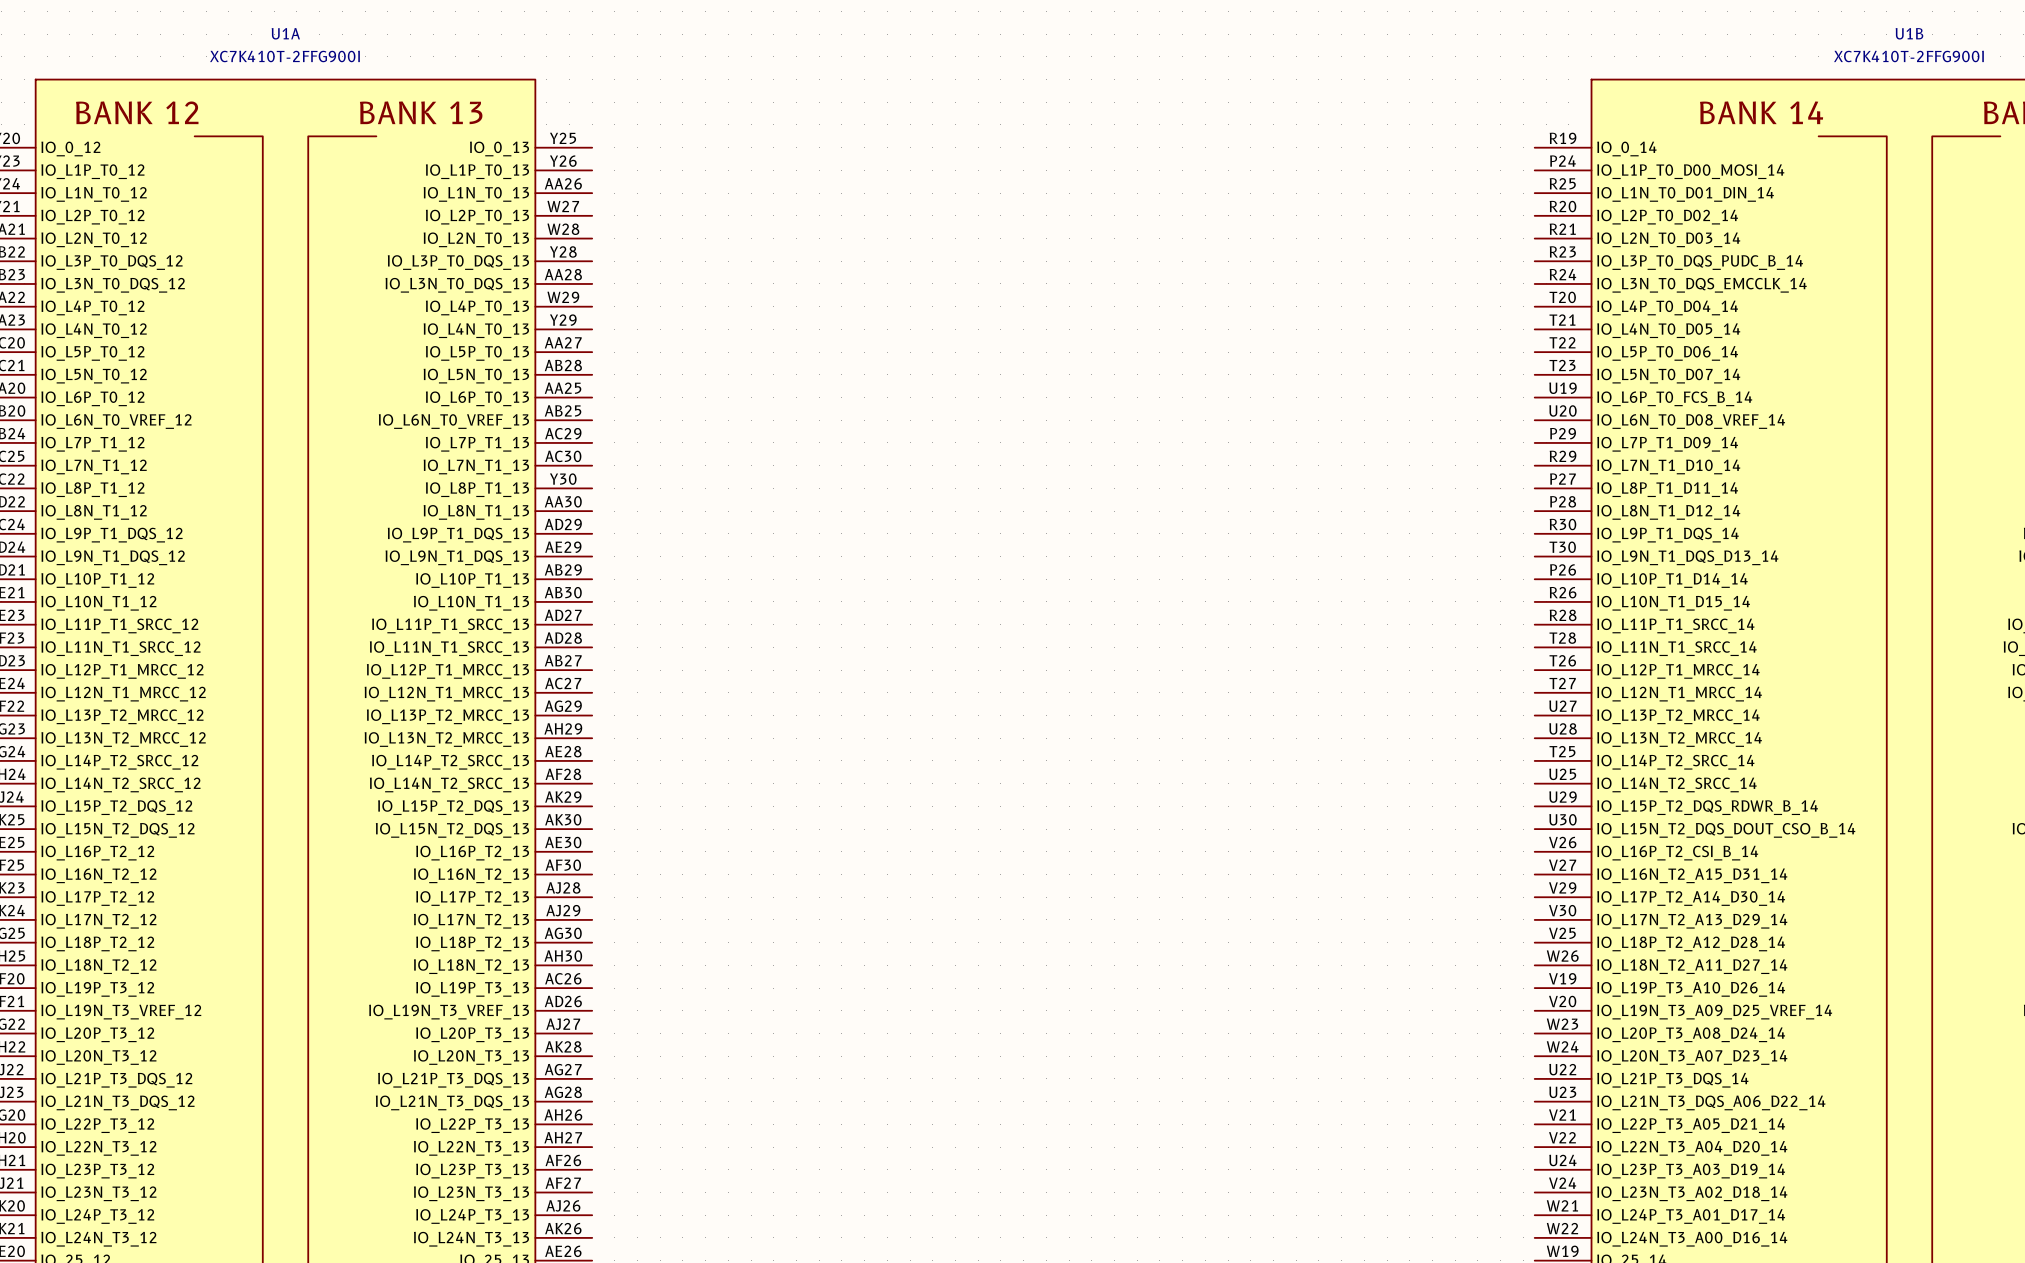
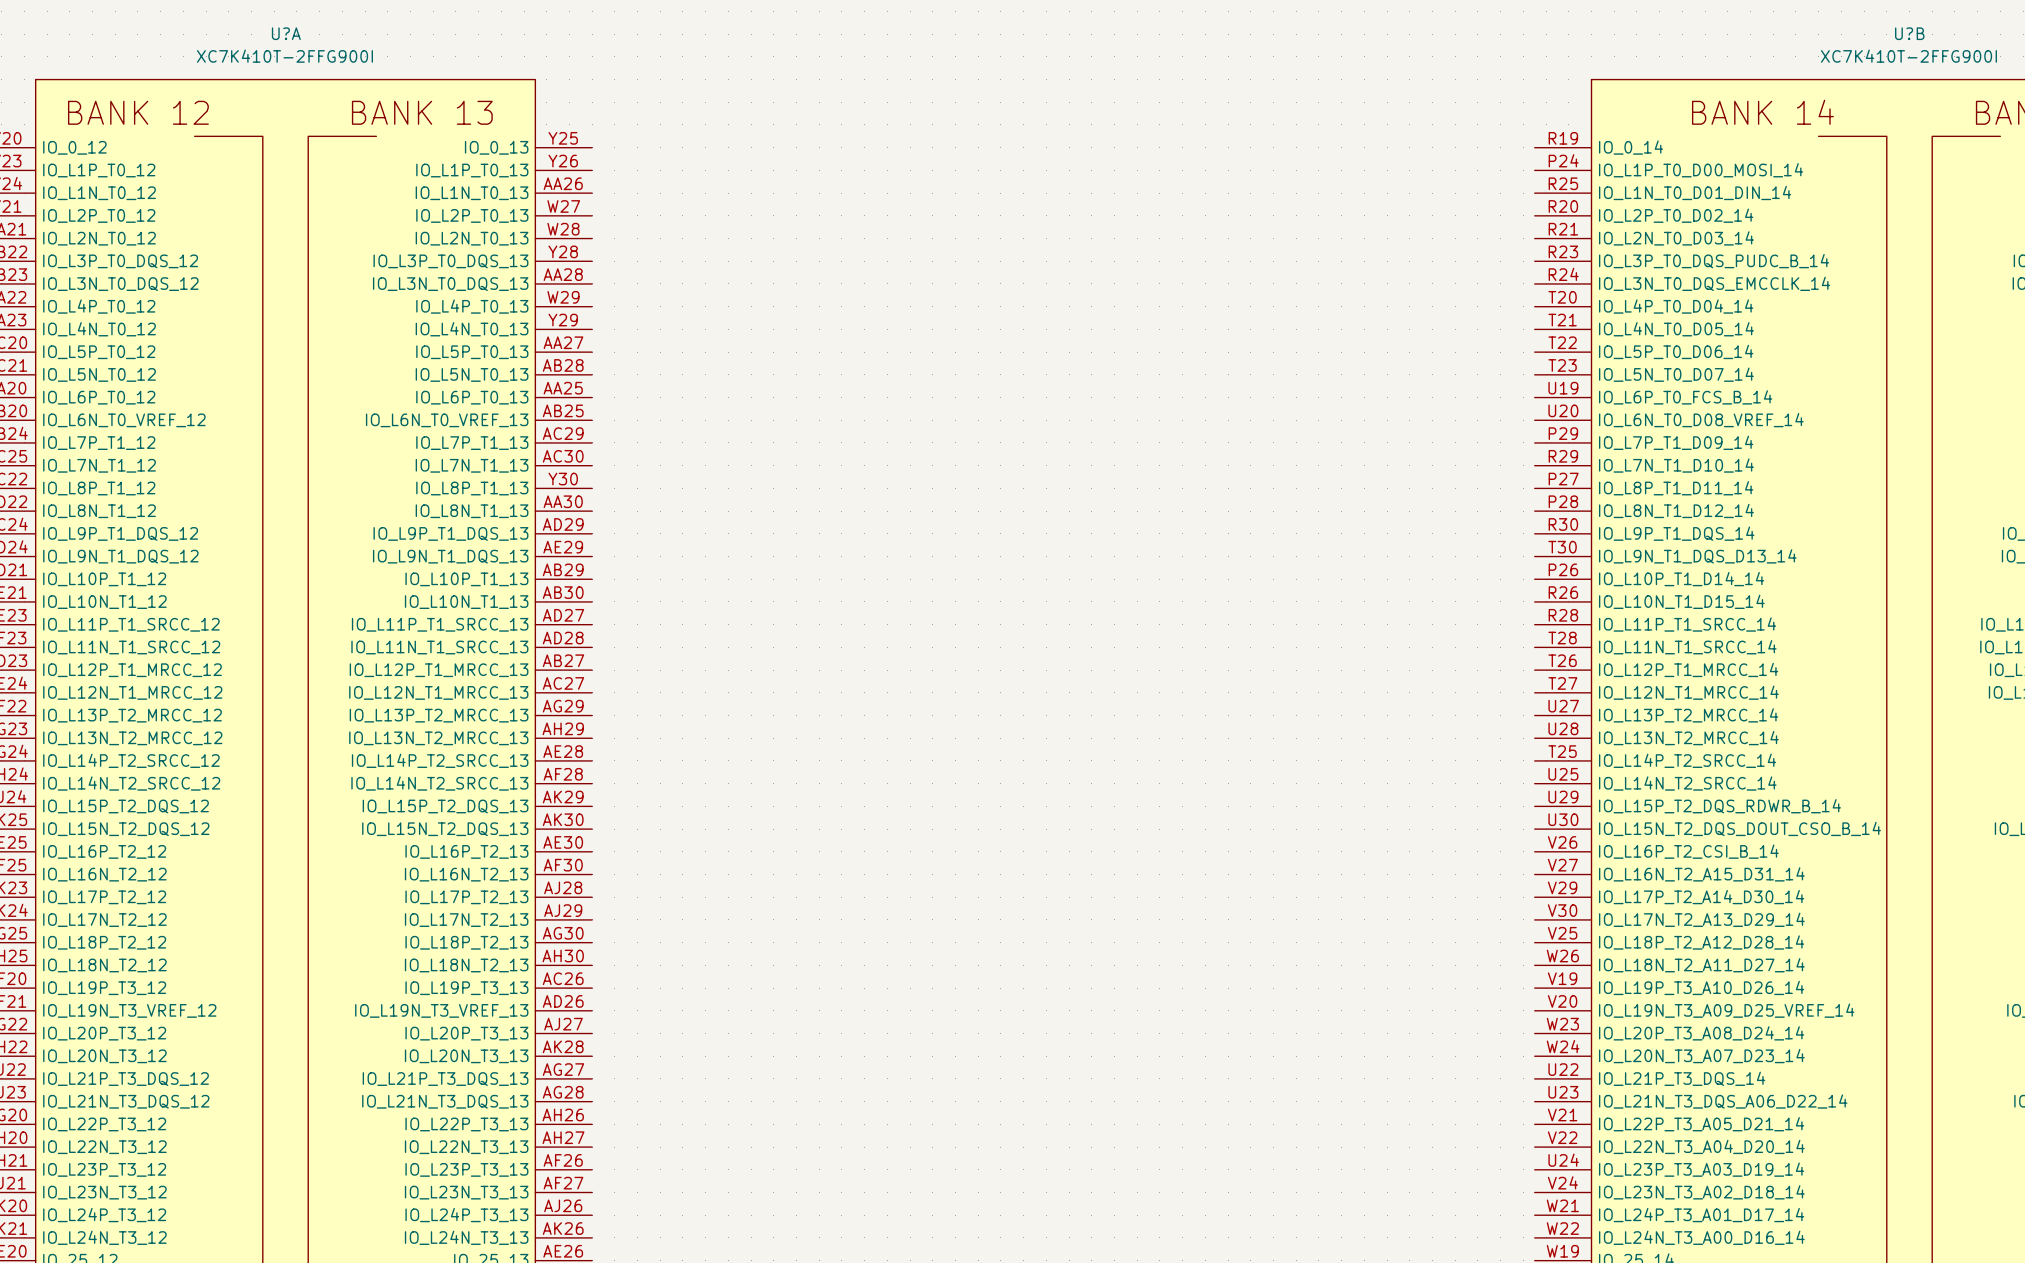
U1A name: U1A (285, 33) -> U?A (286, 33)
U1B name: U1B (1909, 33) -> U?B (1909, 33)

